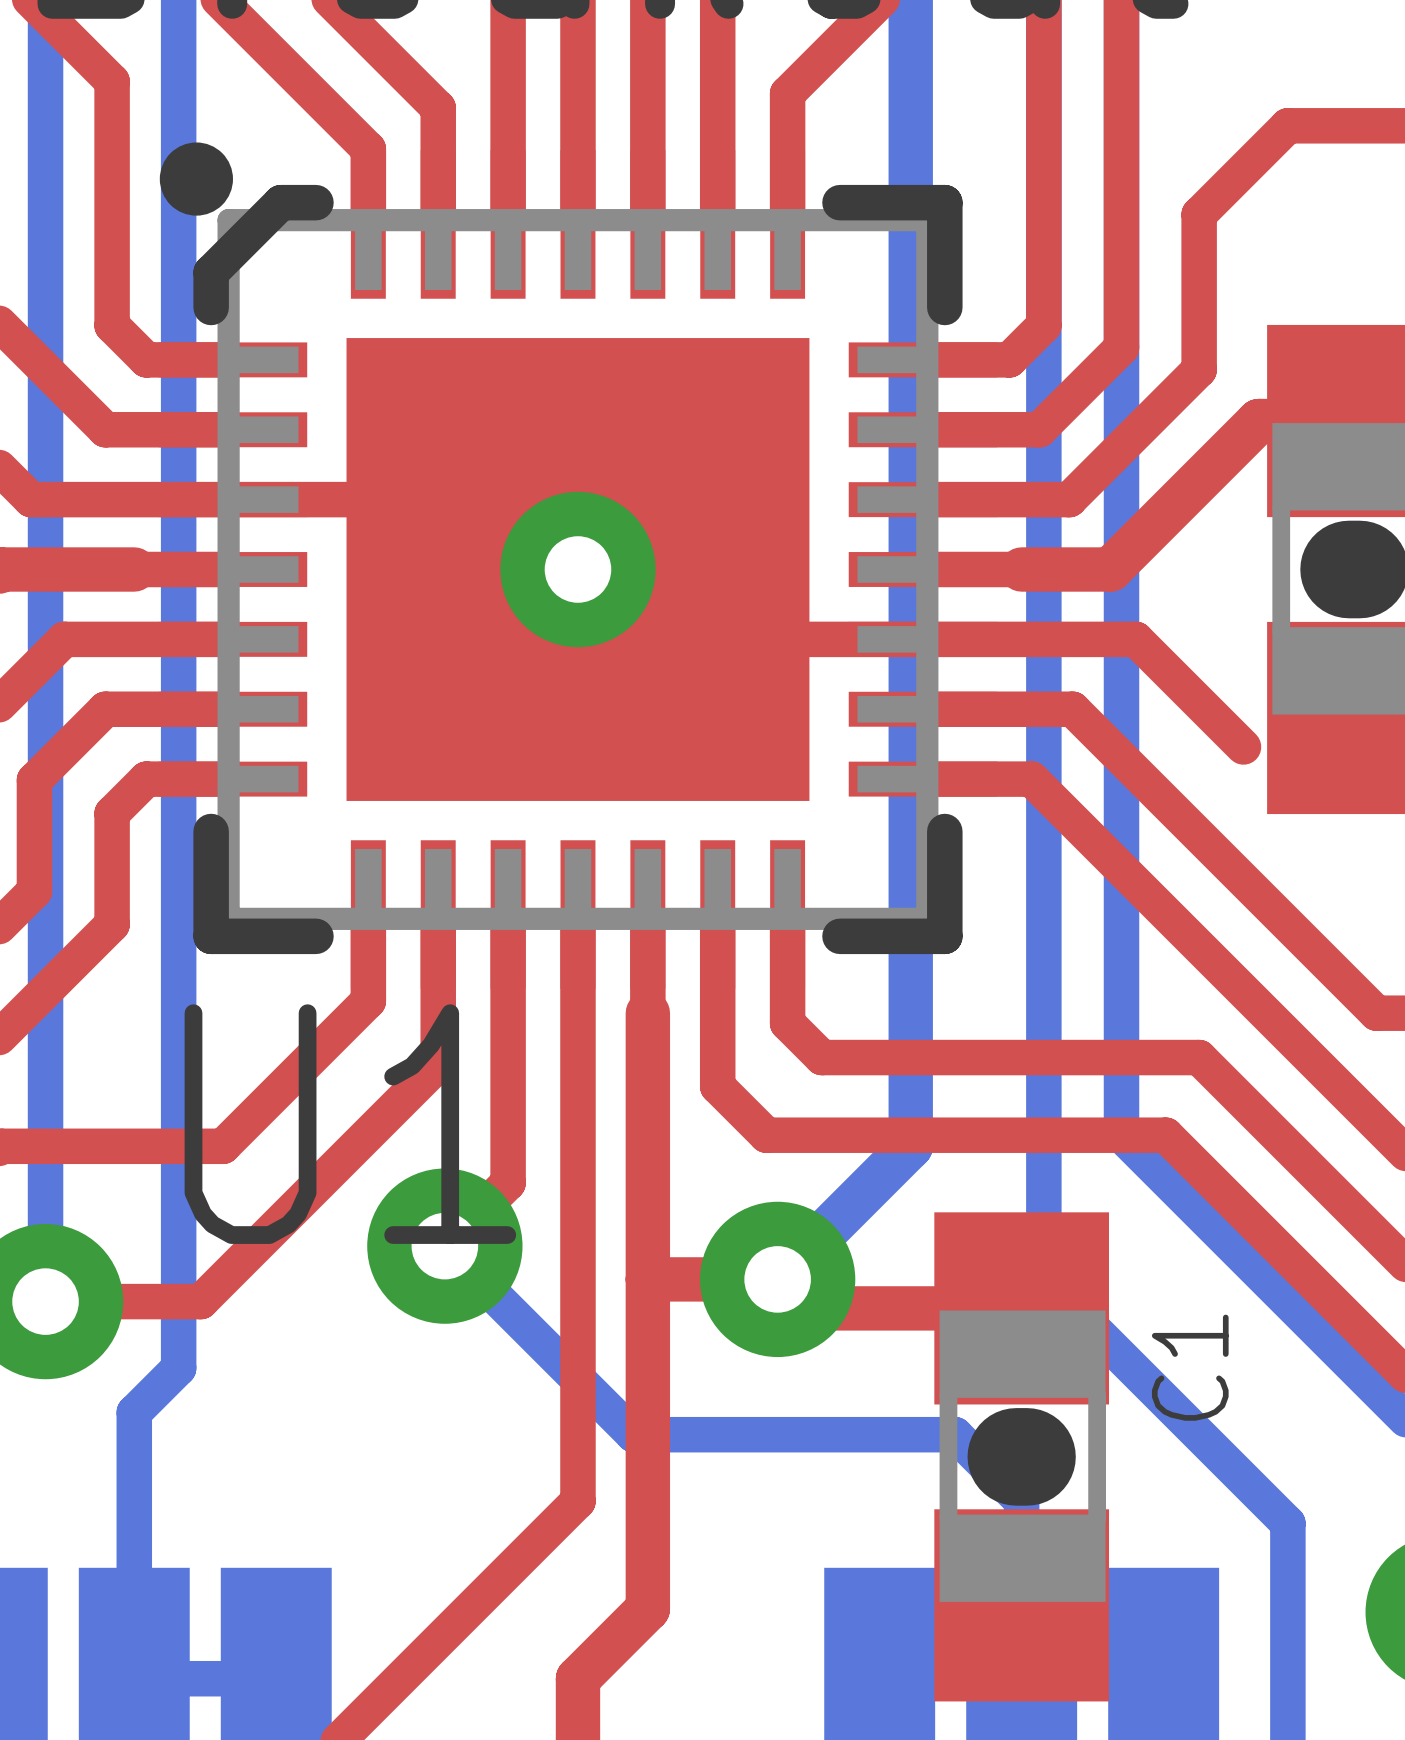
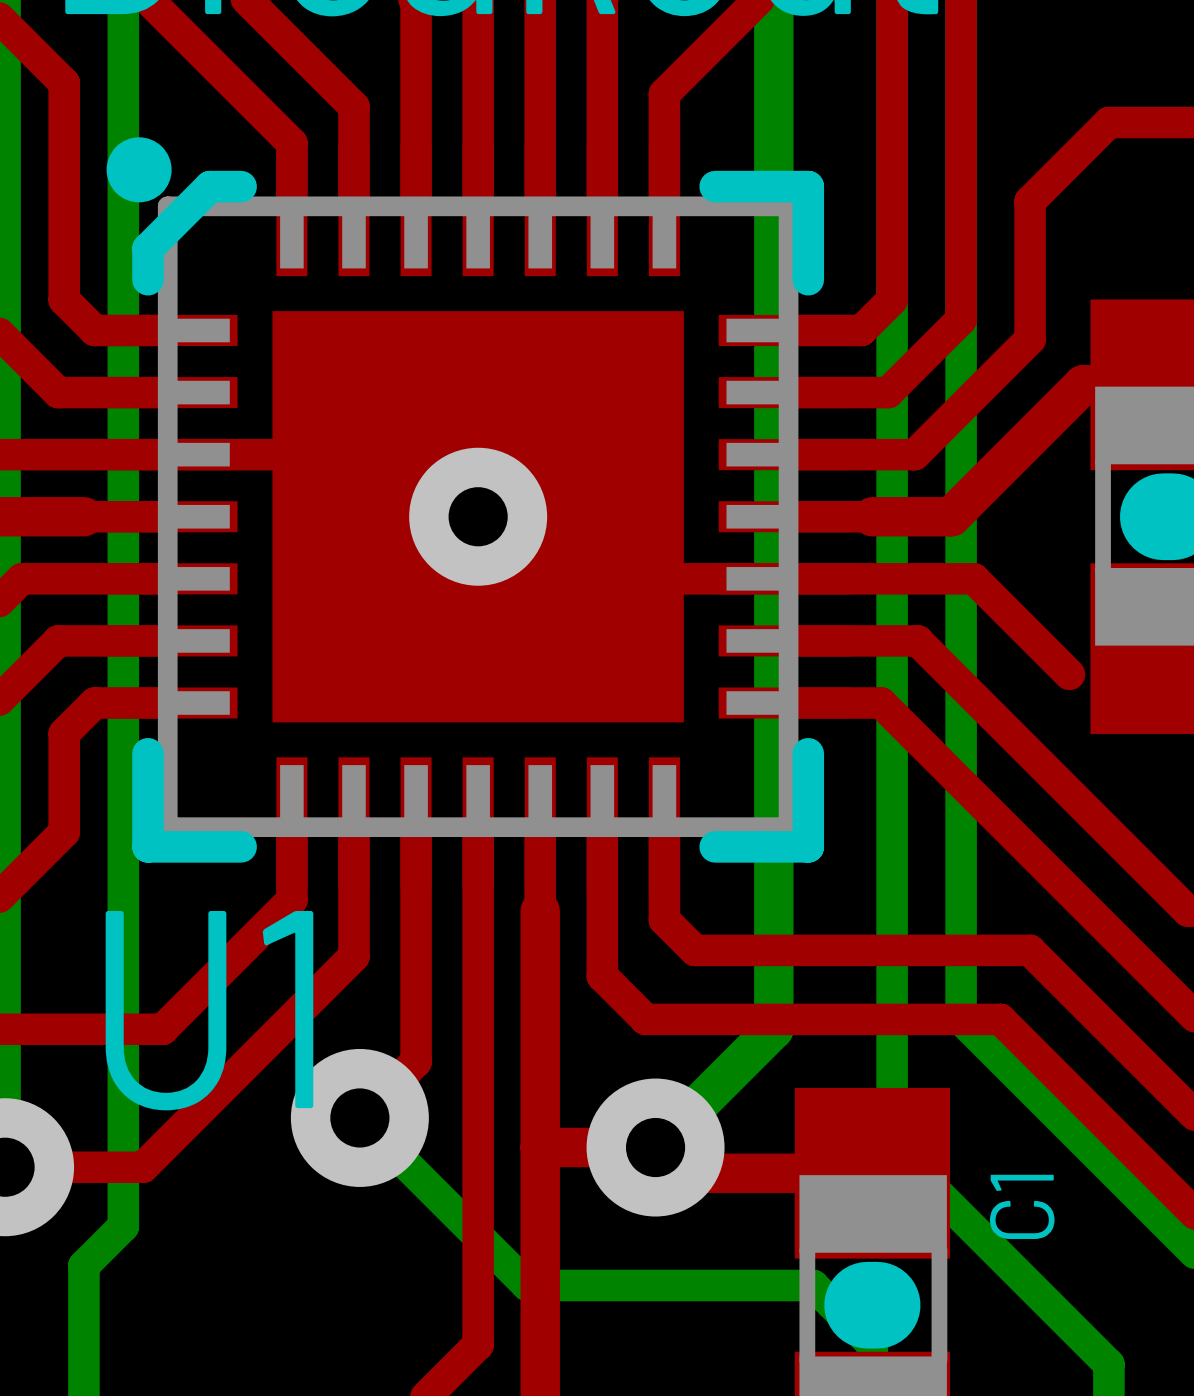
U1 footprint: [158, 142, 998, 989] -> [105, 137, 851, 890]

